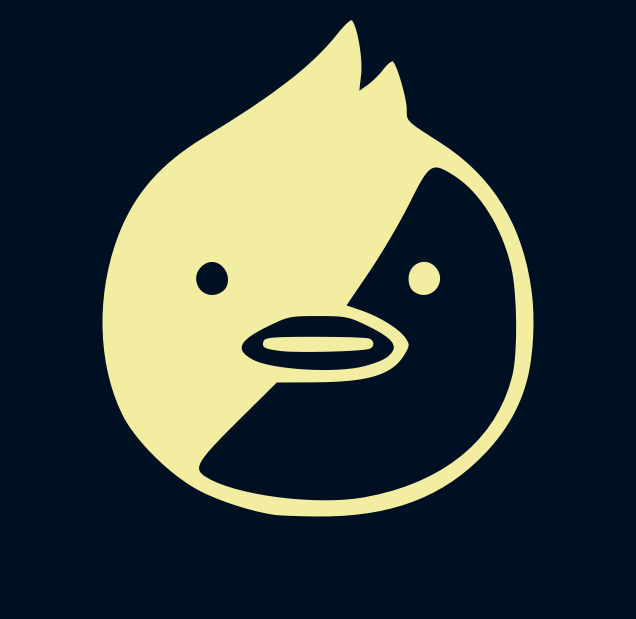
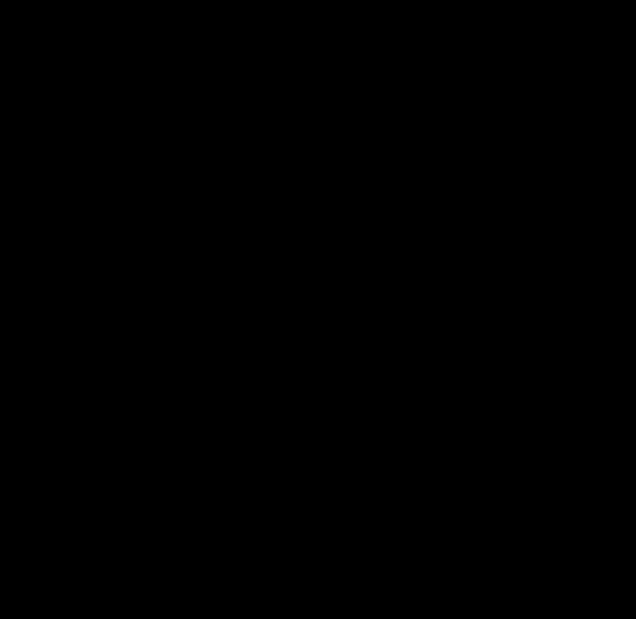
drawing: [102, 20, 534, 517] -> none

